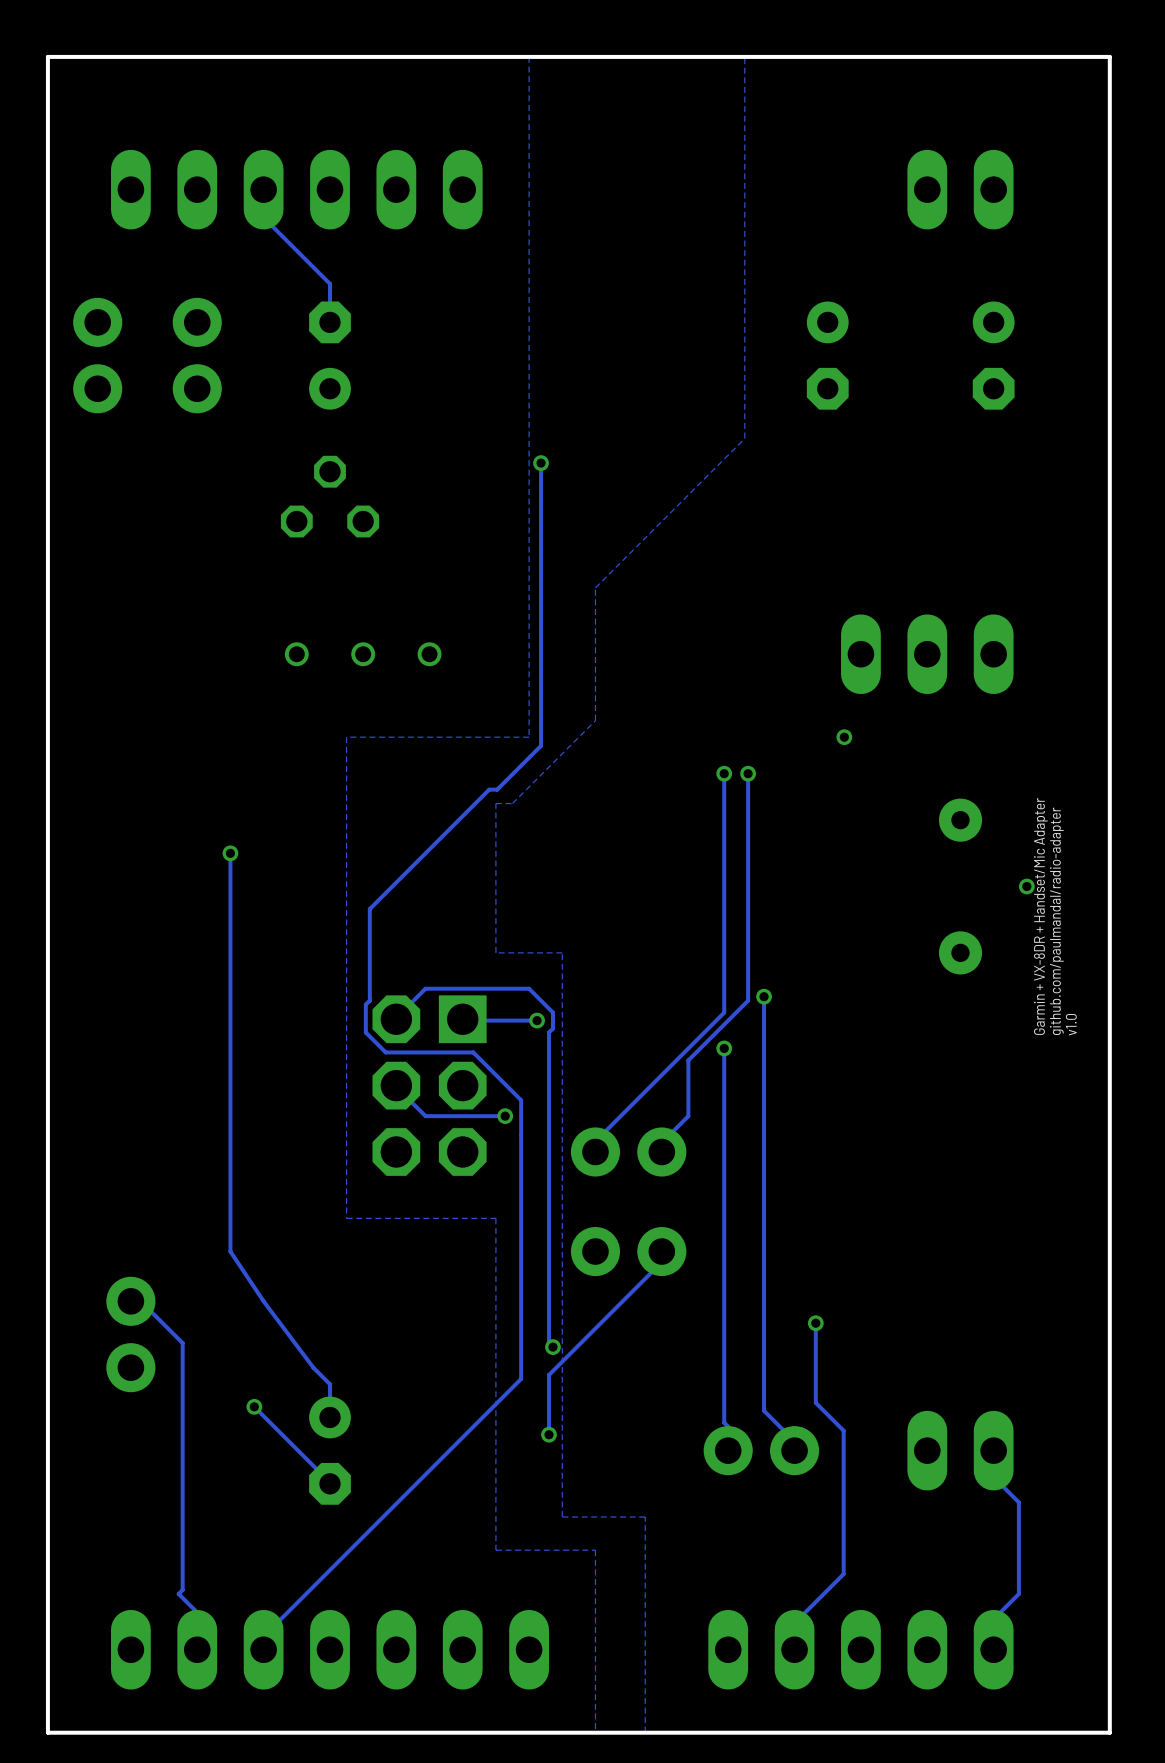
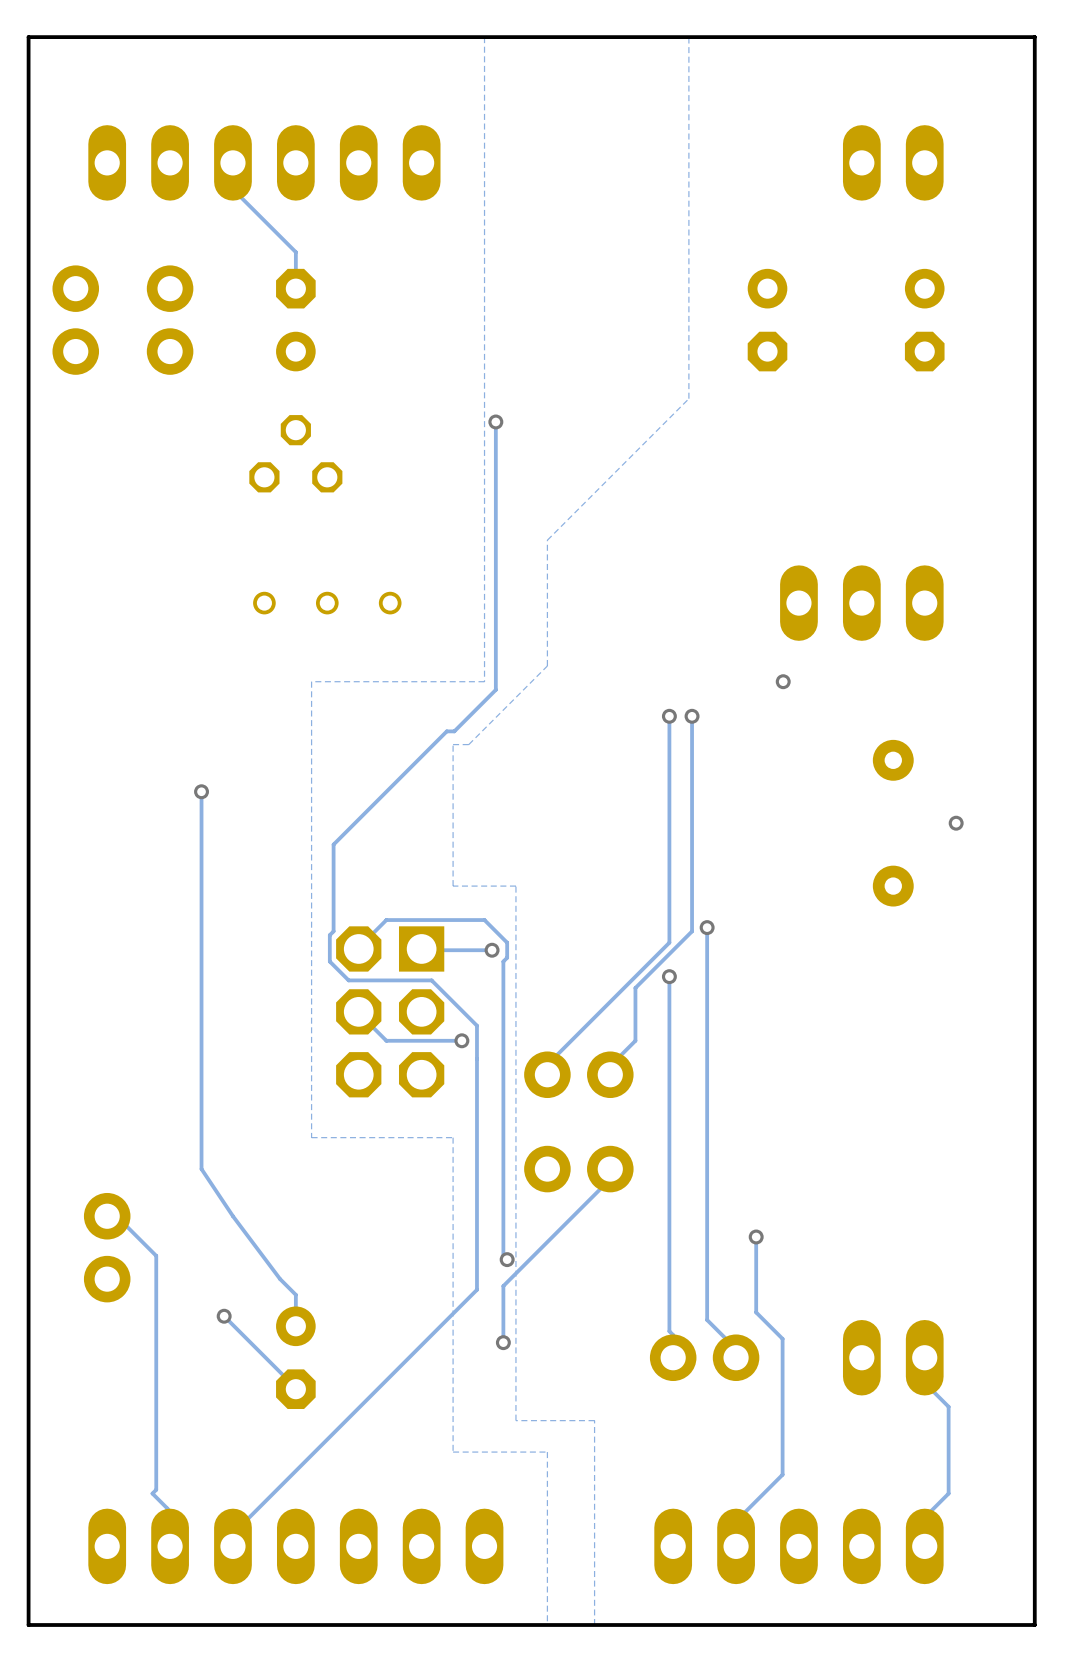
text: Garmin + VX-8DR + Handset/Mic Adapter (1040, 916) -> none
text: github.com/paulmandal/radio-adapter (1056, 921) -> none
text: v1.0 (1071, 1024) -> none

